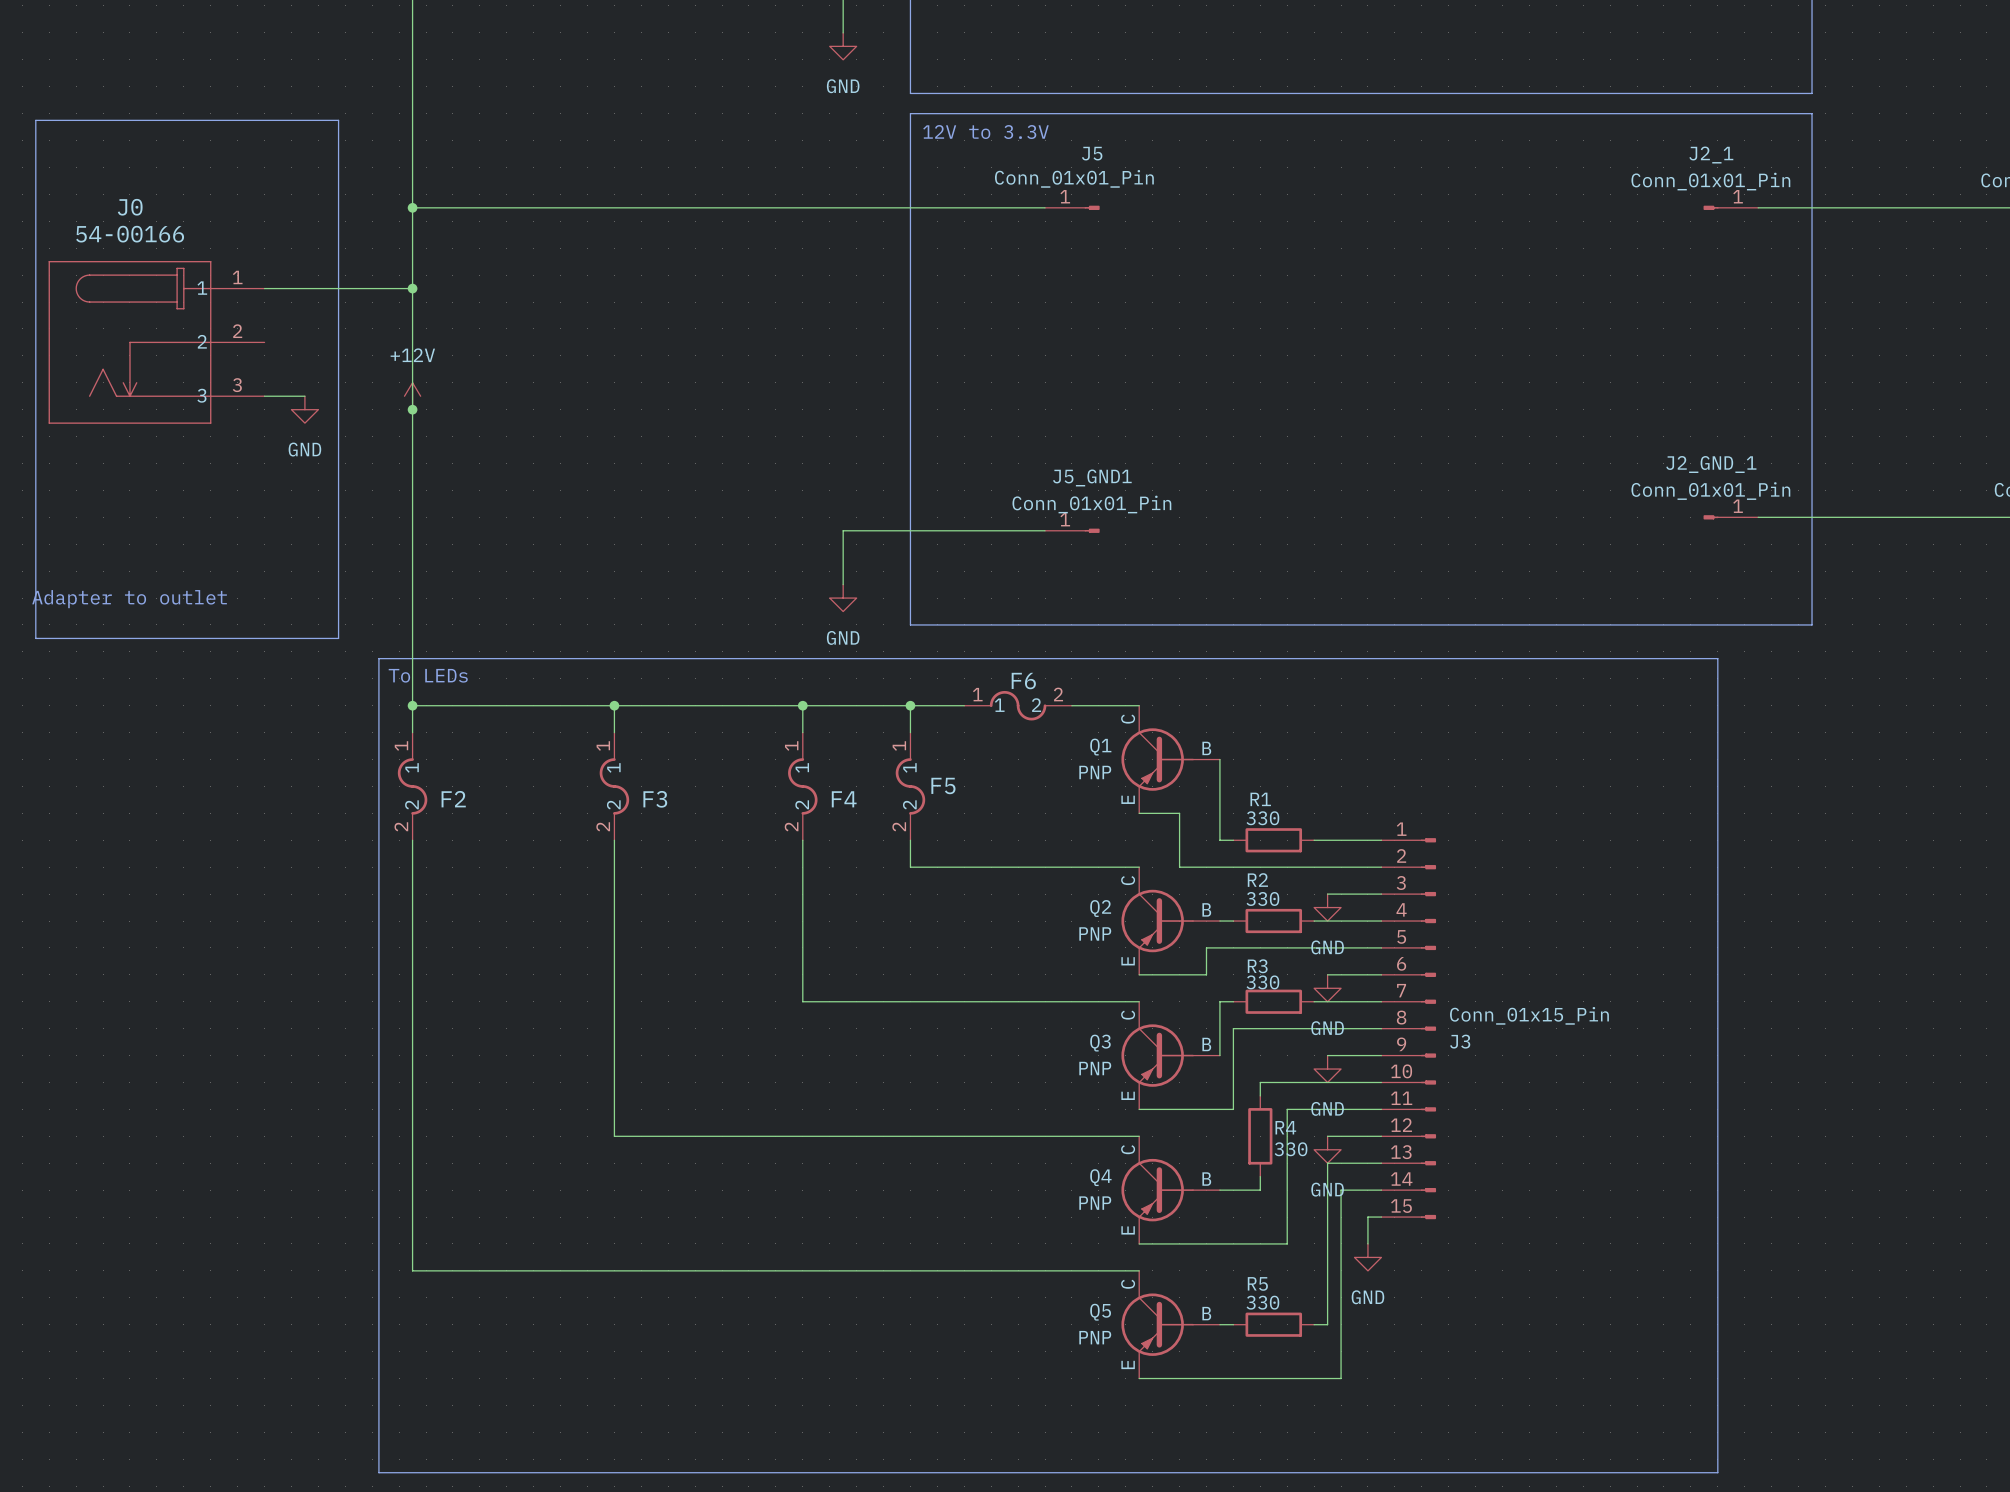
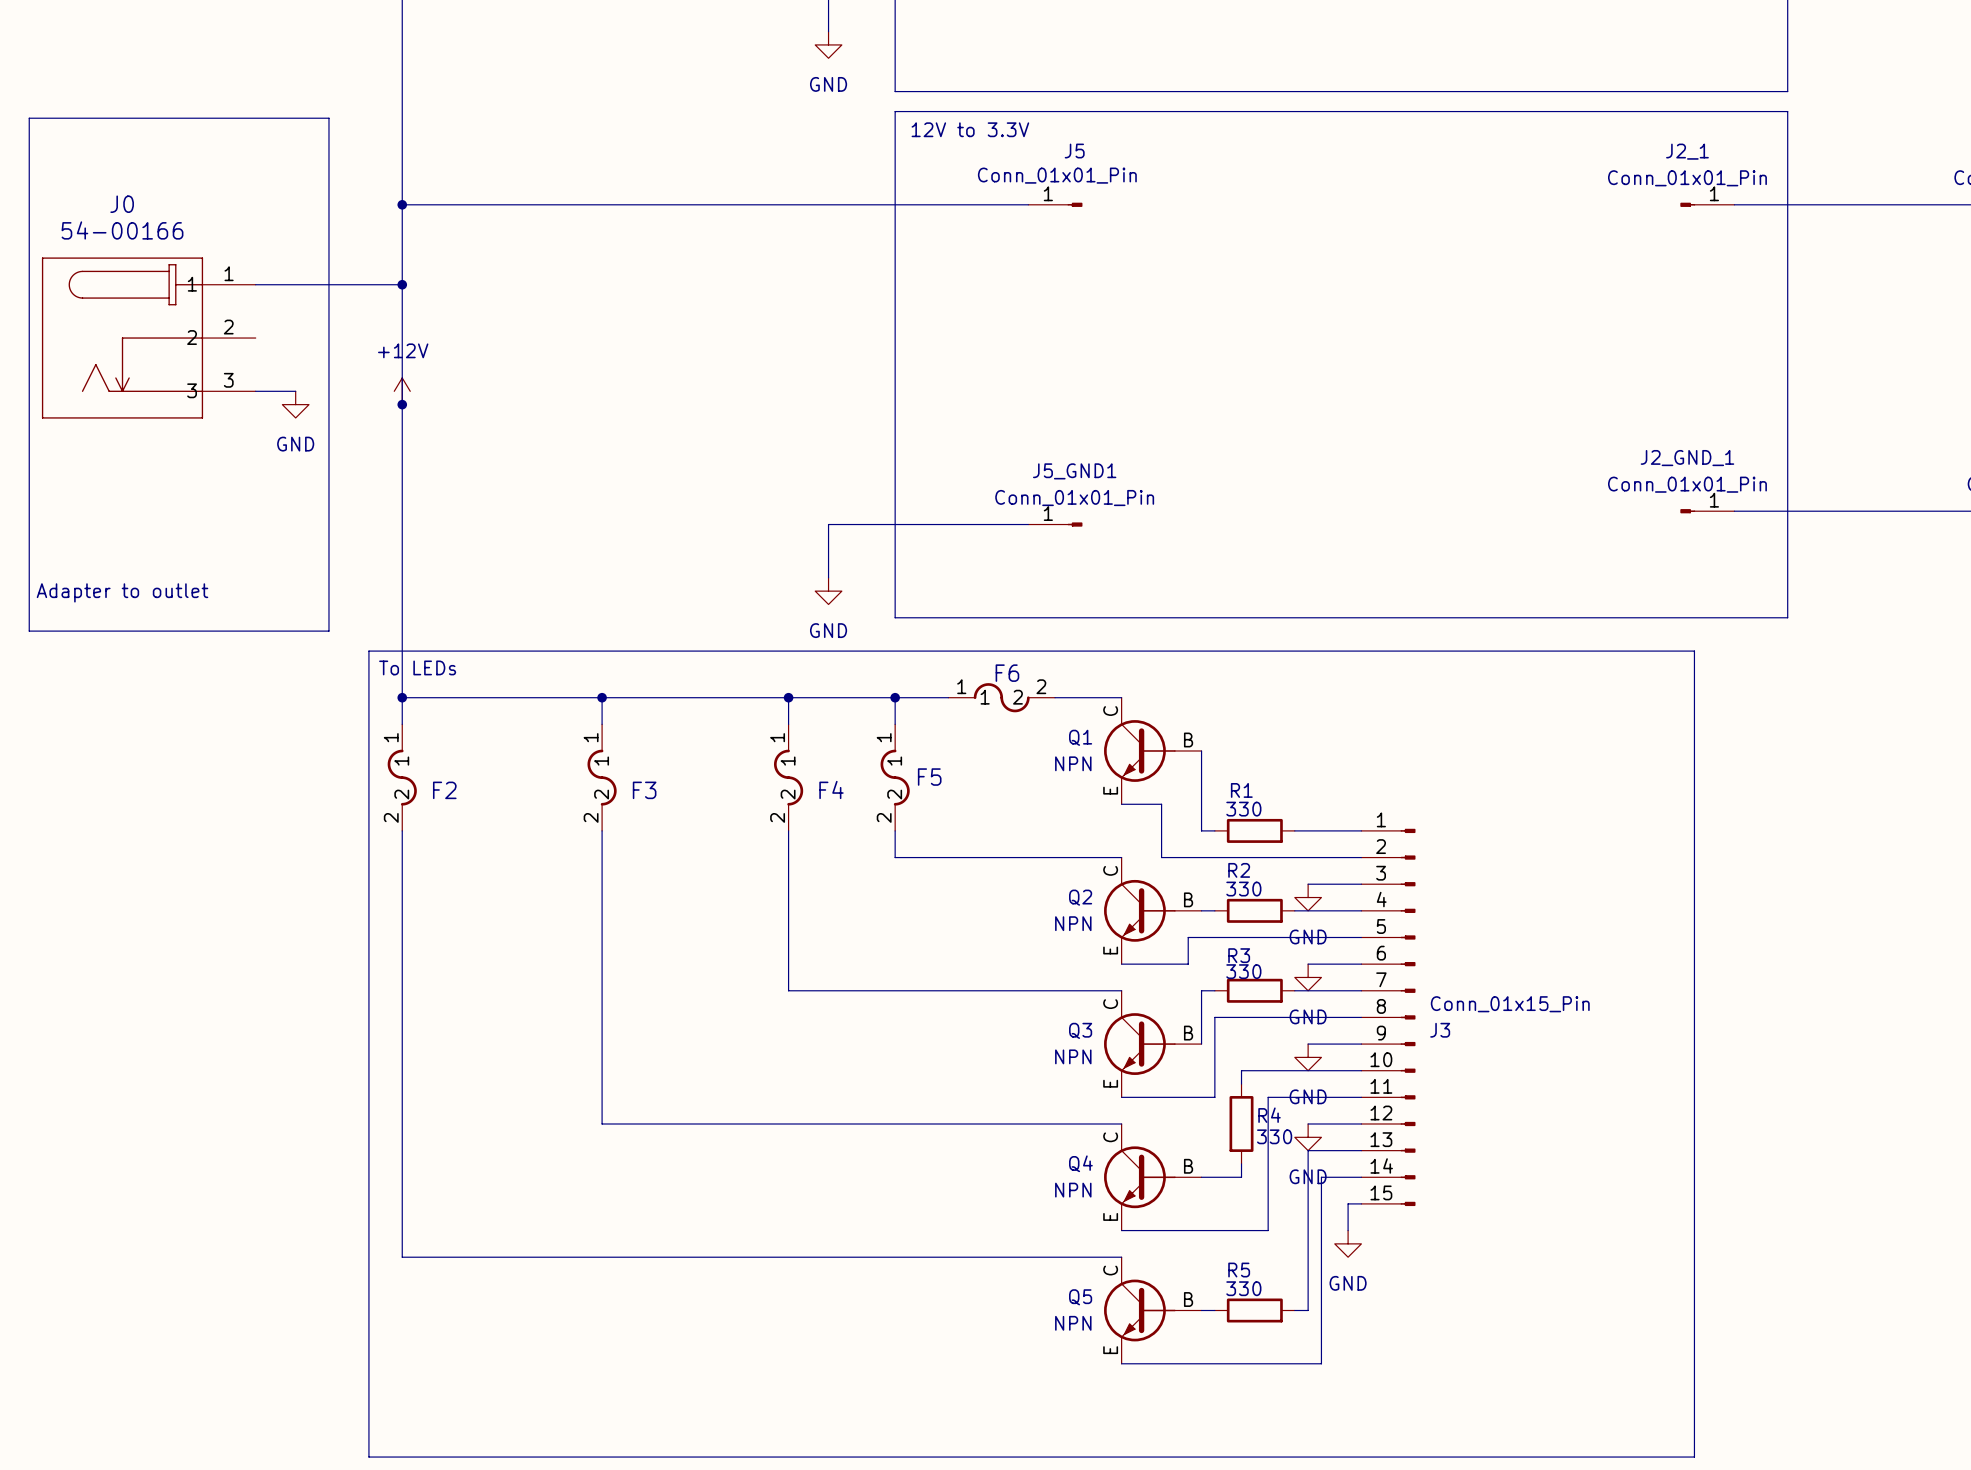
Q1 symbol: [1121, 705, 1220, 814] -> [1104, 697, 1202, 805]
Q1 value: PNP (1095, 772) -> NPN (1073, 763)
Q2 symbol: [1121, 867, 1220, 975] -> [1104, 857, 1202, 965]
Q2 value: PNP (1095, 933) -> NPN (1073, 923)
Q3 symbol: [1121, 1001, 1220, 1110] -> [1104, 990, 1202, 1098]
Q3 value: PNP (1095, 1068) -> NPN (1073, 1056)
Q4 symbol: [1121, 1136, 1220, 1244] -> [1104, 1123, 1202, 1231]
Q4 value: PNP (1095, 1203) -> NPN (1073, 1190)
Q5 symbol: [1121, 1270, 1220, 1379] -> [1104, 1257, 1202, 1364]
Q5 value: PNP (1095, 1337) -> NPN (1073, 1323)

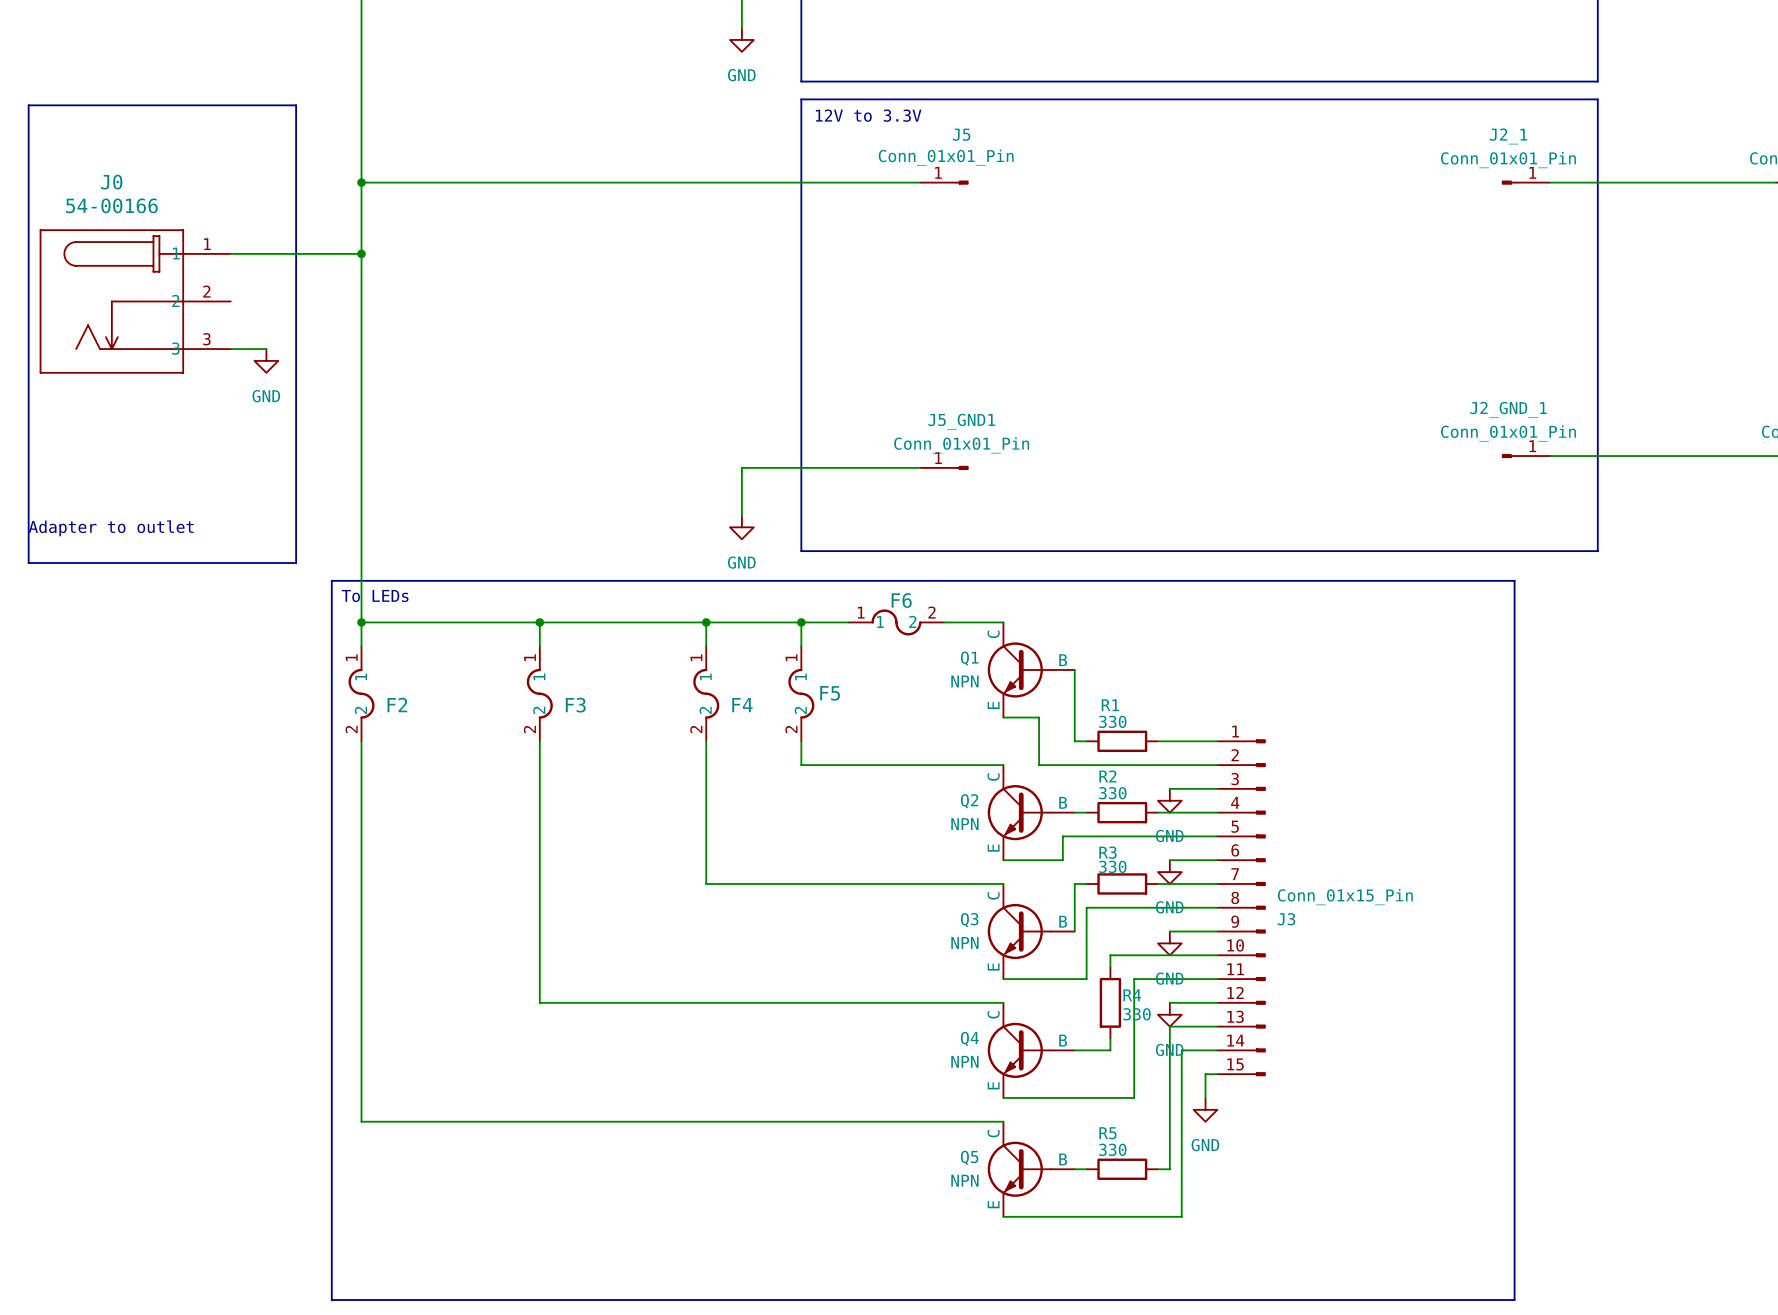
power symbol: +12V (402, 391) -> none
junction: (402, 404) -> none

